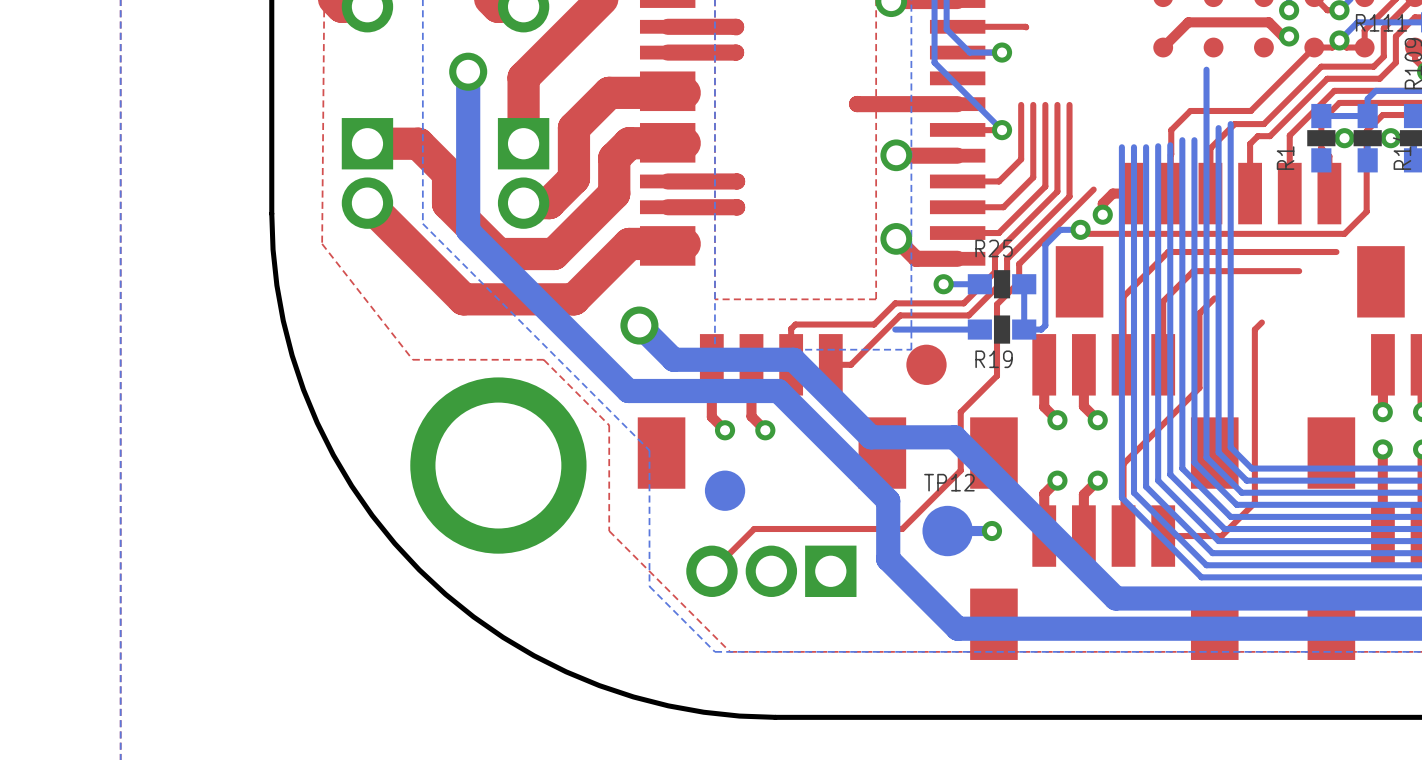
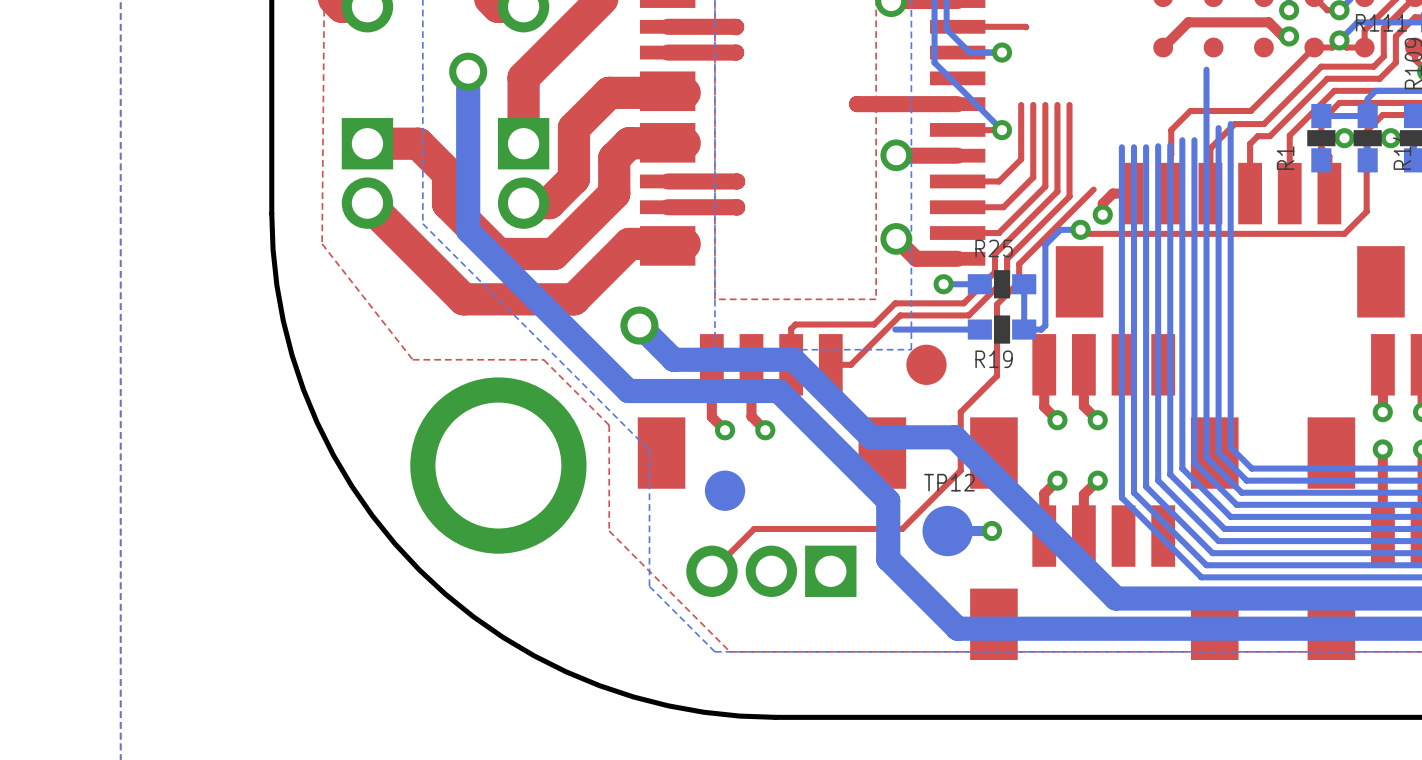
top track: (1336, 252) (1168, 252) (1123, 296) (1123, 364) -> none
top track: (1299, 271) (1193, 271) (1163, 301) (1163, 364) -> none
top track: (1214, 298) (1199, 313) (1199, 387) (1123, 463) (1123, 536) -> none
top track: (1261, 322) (1254, 329) (1254, 502) (1221, 536) (1163, 536) -> none

